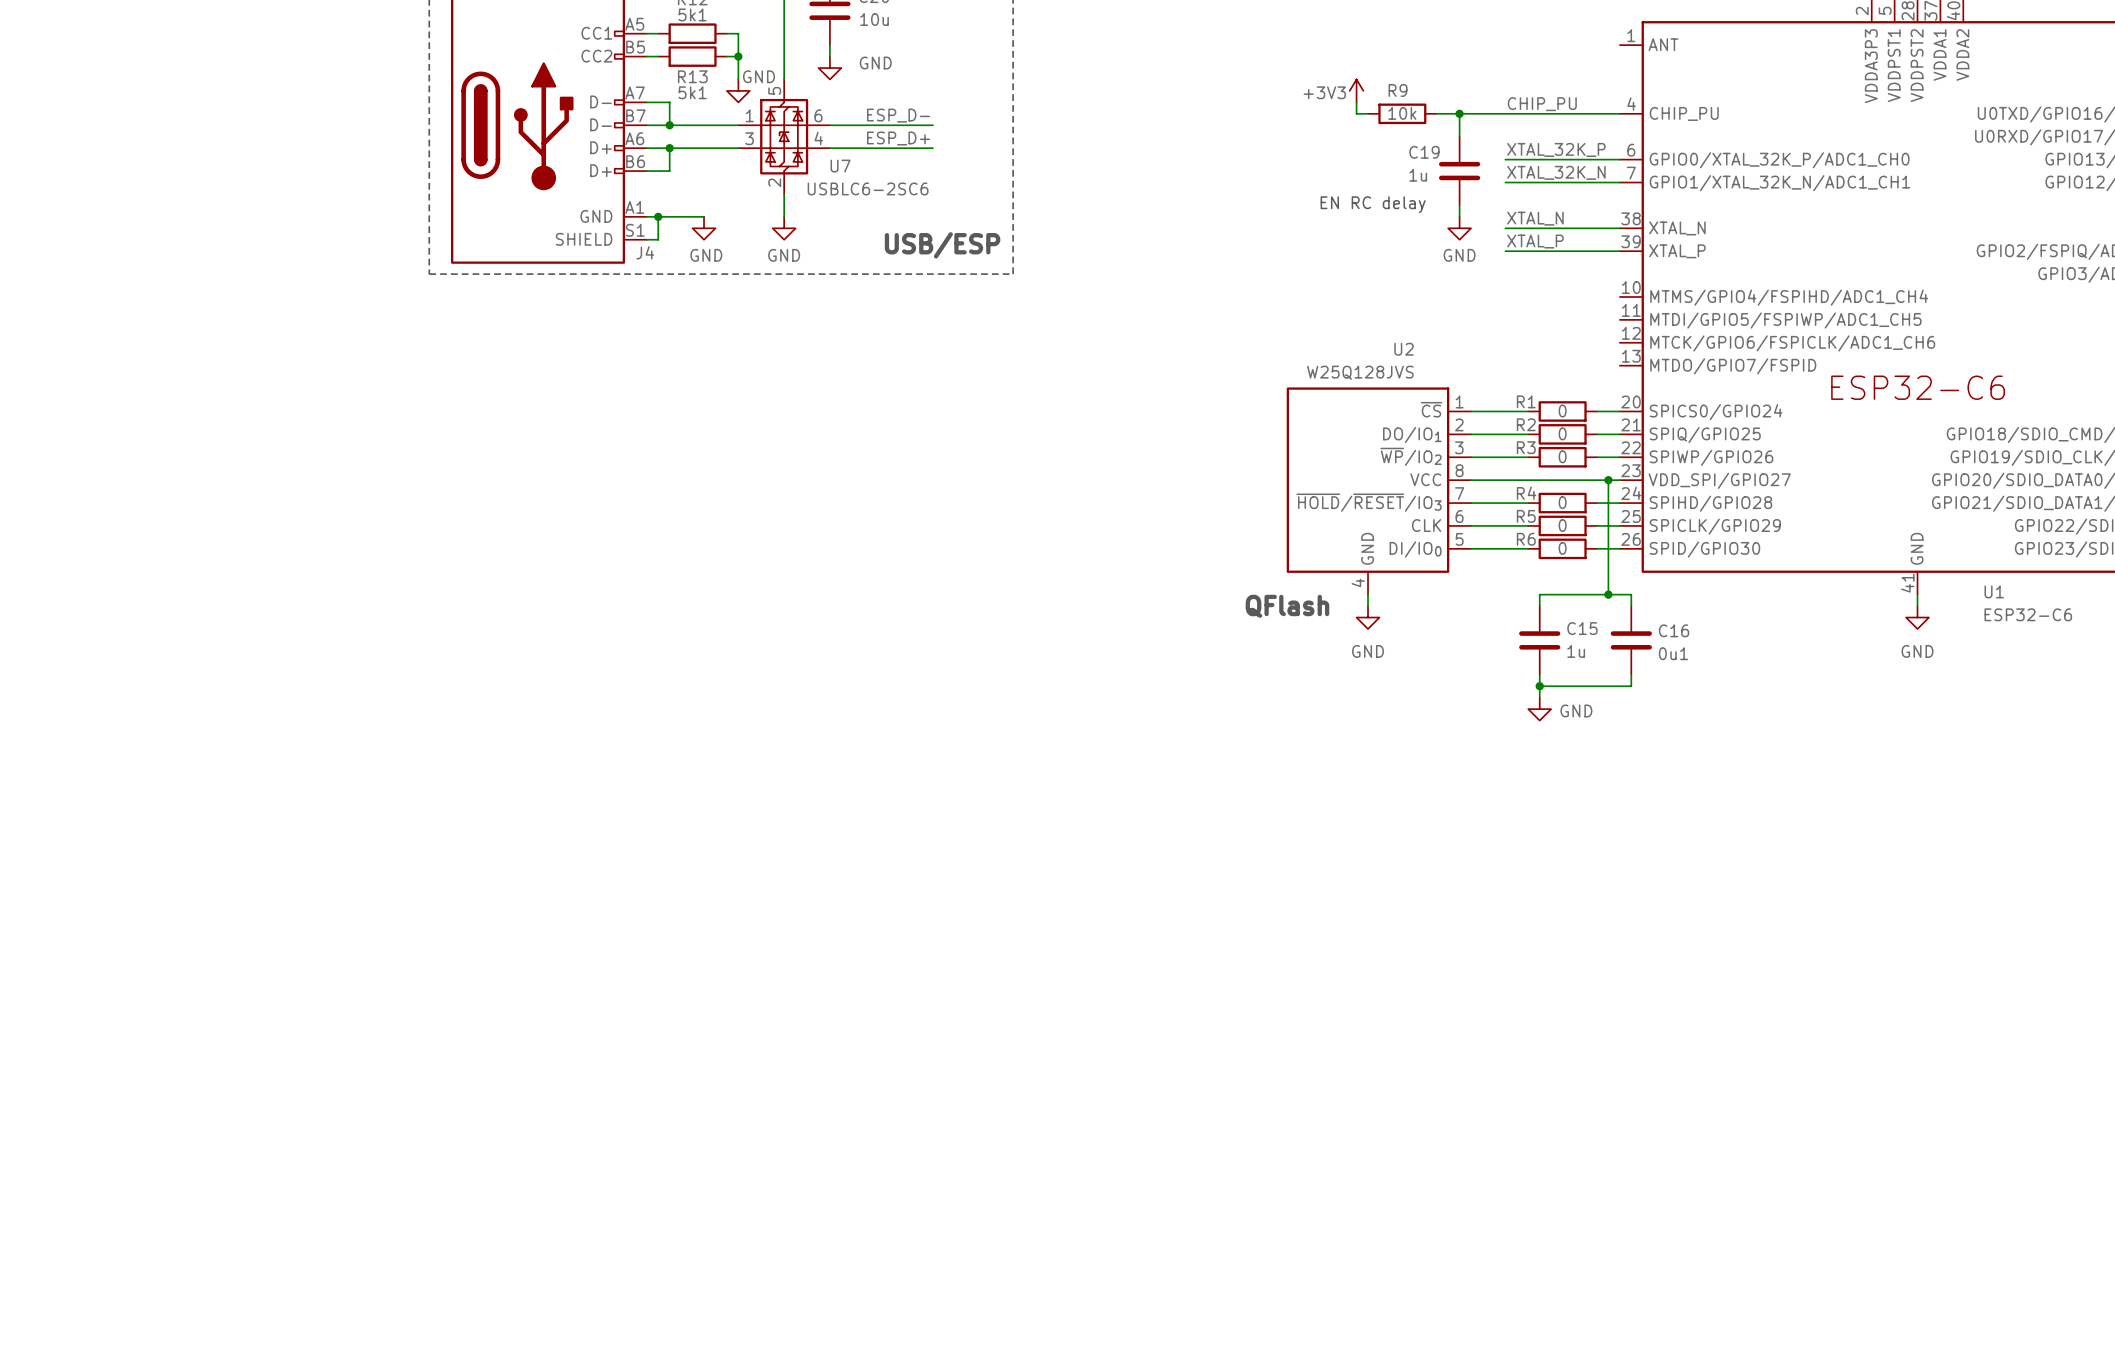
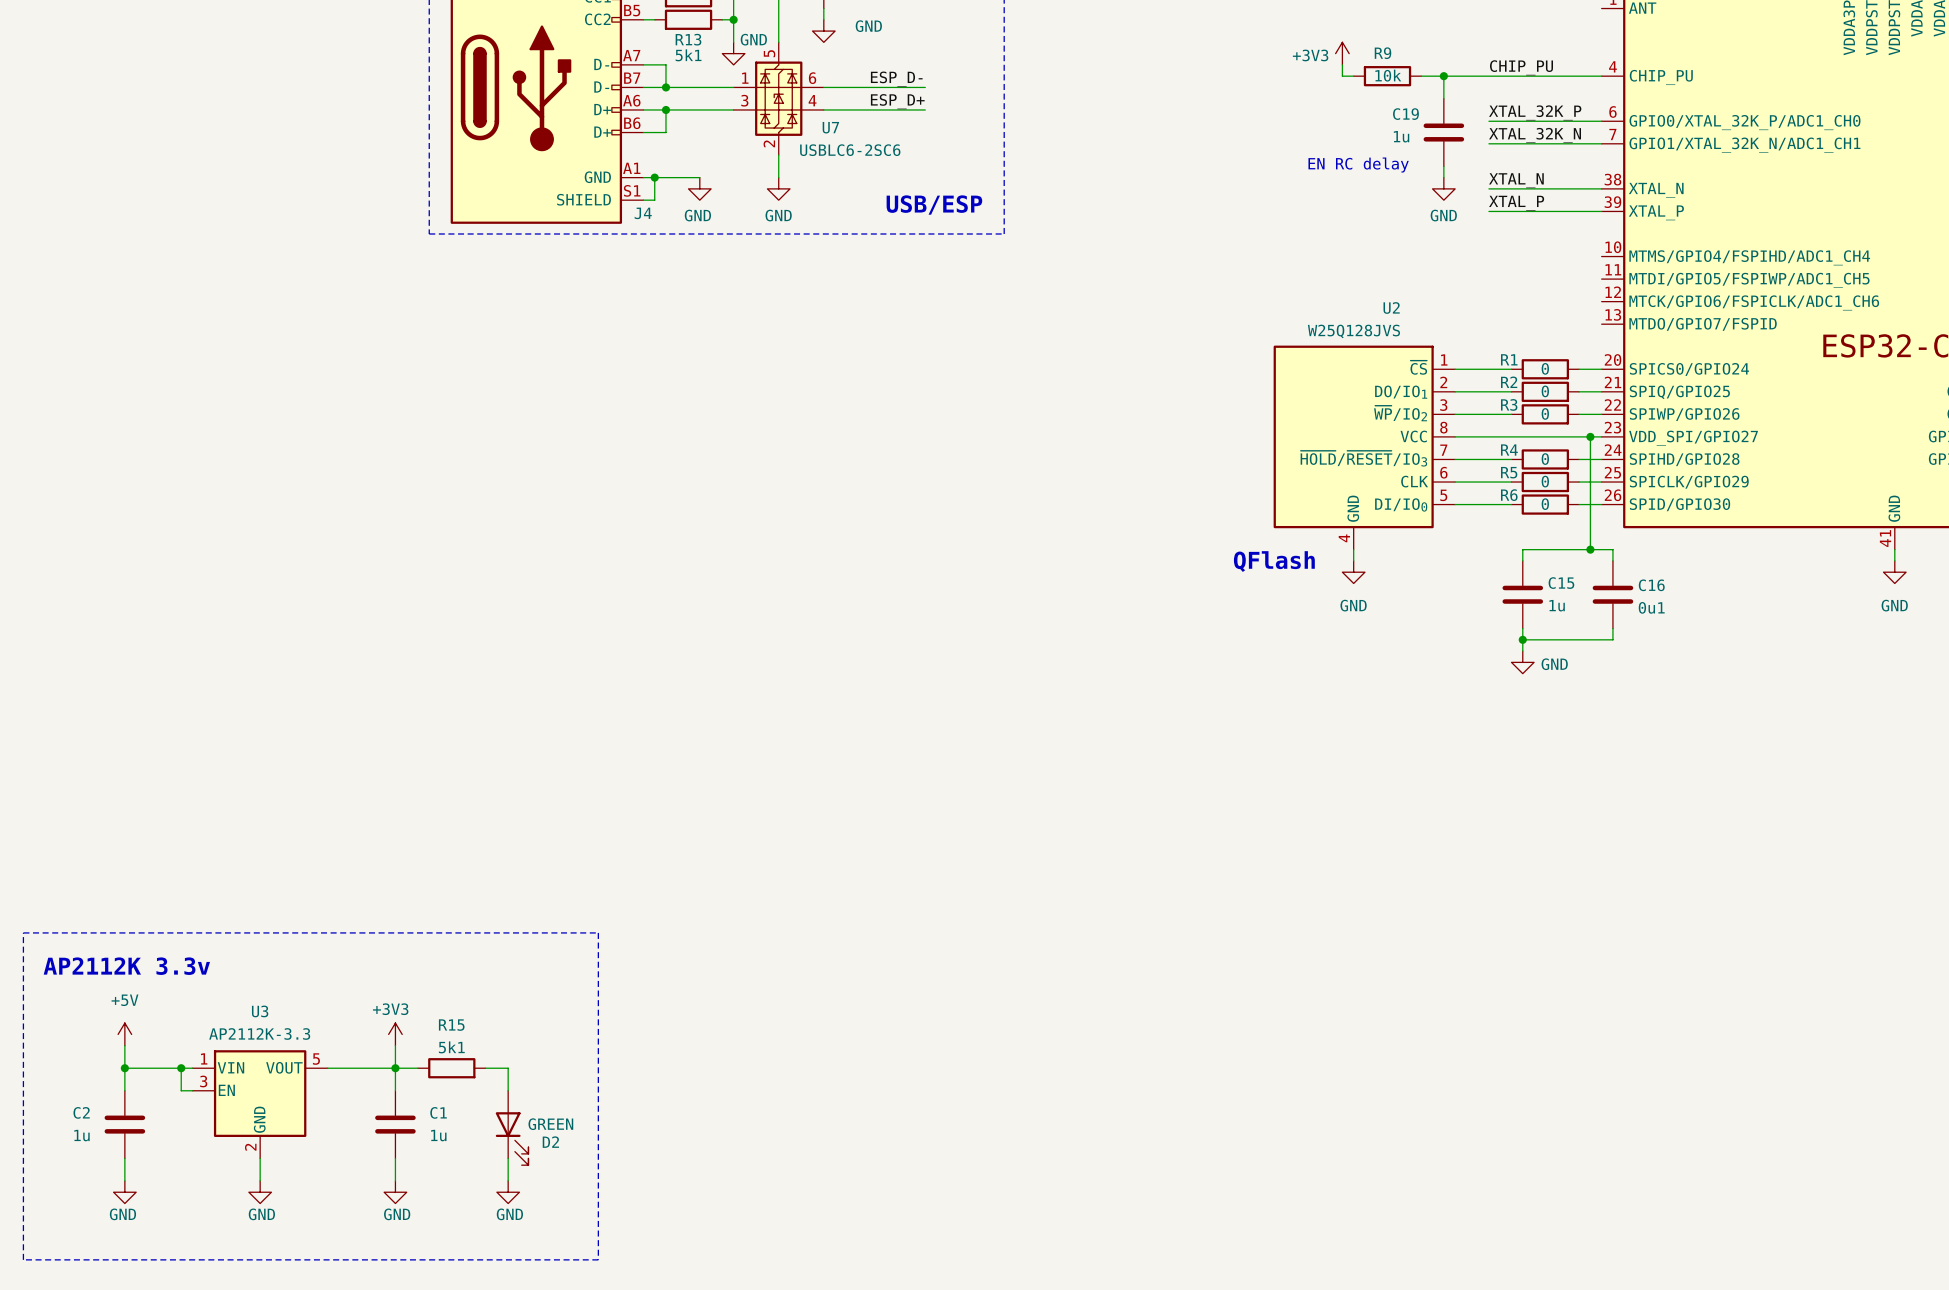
line: none -> (23, 932) (598, 932) (598, 1259) (23, 1259) (23, 932)
text: none -> AP2112K 3.3v (126, 966)
power symbol: none -> +5V (124, 1034)
power symbol: none -> +3V3 (395, 1034)
wire: none -> (124, 1045) (124, 1090)
wire: none -> (395, 1045) (395, 1090)
wire: none -> (124, 1068) (192, 1068)
junction: none -> (124, 1068)
wire: none -> (181, 1068) (181, 1090) (192, 1090)
junction: none -> (181, 1068)
wire: none -> (327, 1068) (417, 1068)
junction: none -> (395, 1068)
R15: none -> 5k1 (451, 1068)
wire: none -> (485, 1068) (508, 1068) (508, 1090)
U3: none -> AP2112K-3.3 (260, 1104)
C2: none -> 1u (124, 1124)
C1: none -> 1u (395, 1124)
D2: none -> GREEN (512, 1127)
wire: none -> (124, 1158) (124, 1180)
wire: none -> (260, 1158) (260, 1180)
wire: none -> (395, 1158) (395, 1180)
wire: none -> (508, 1158) (508, 1180)
power symbol: none -> GND (124, 1192)
power symbol: none -> GND (260, 1192)
power symbol: none -> GND (395, 1192)
power symbol: none -> GND (508, 1192)

